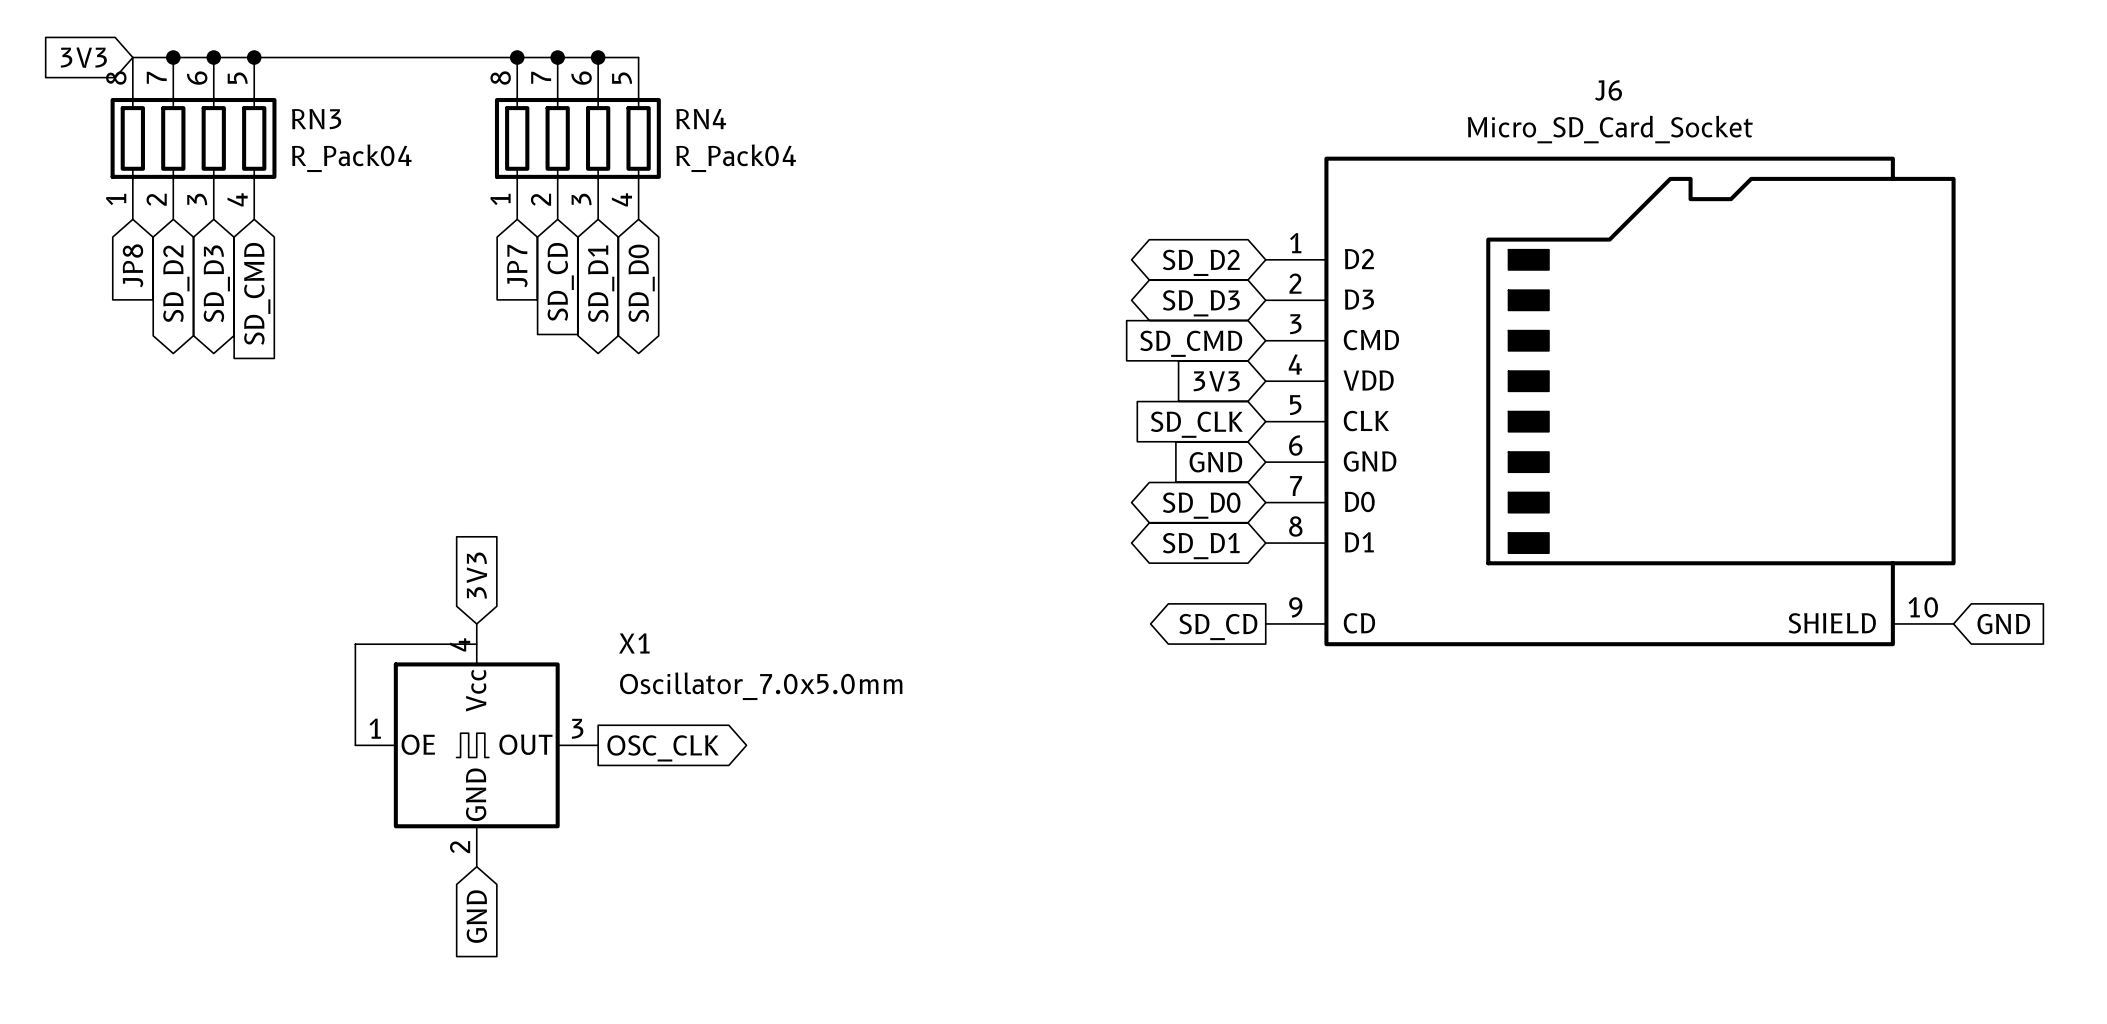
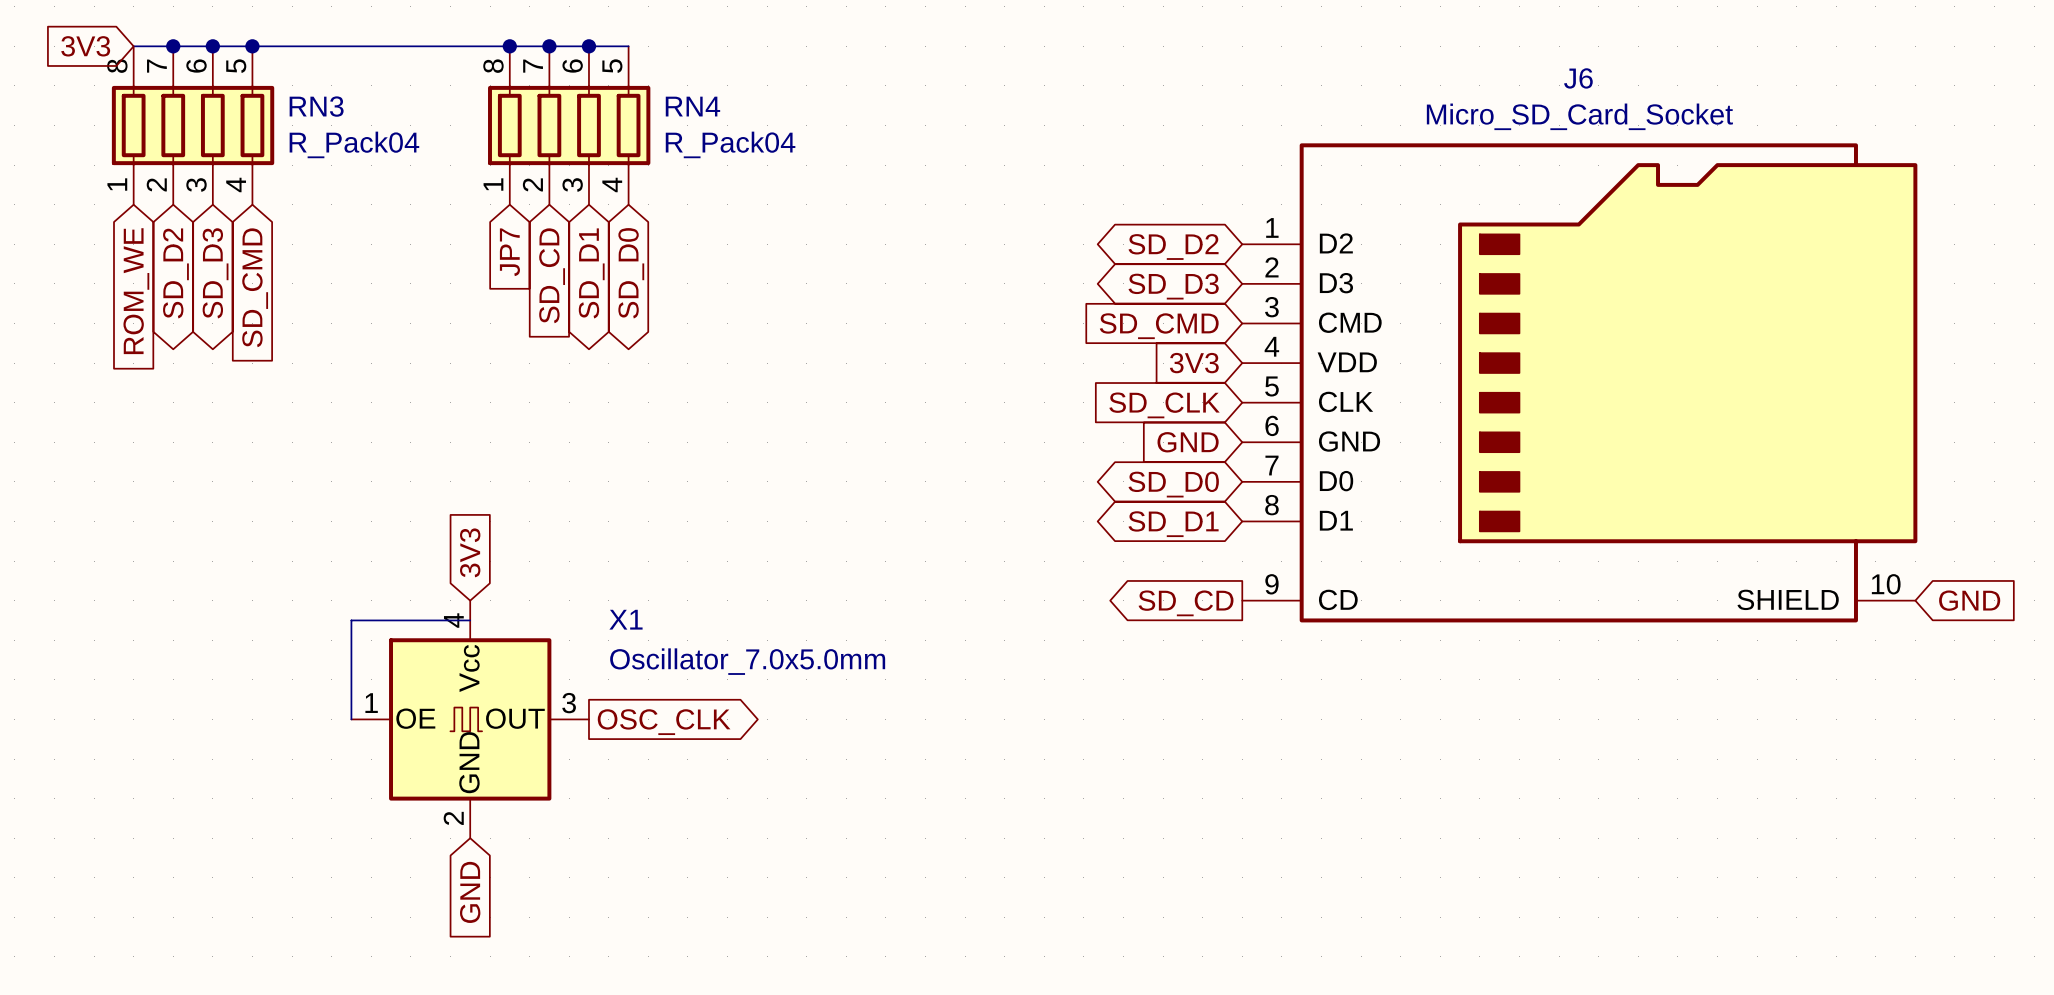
global label: JP8 (132, 265) -> ROM_WE (136, 291)

